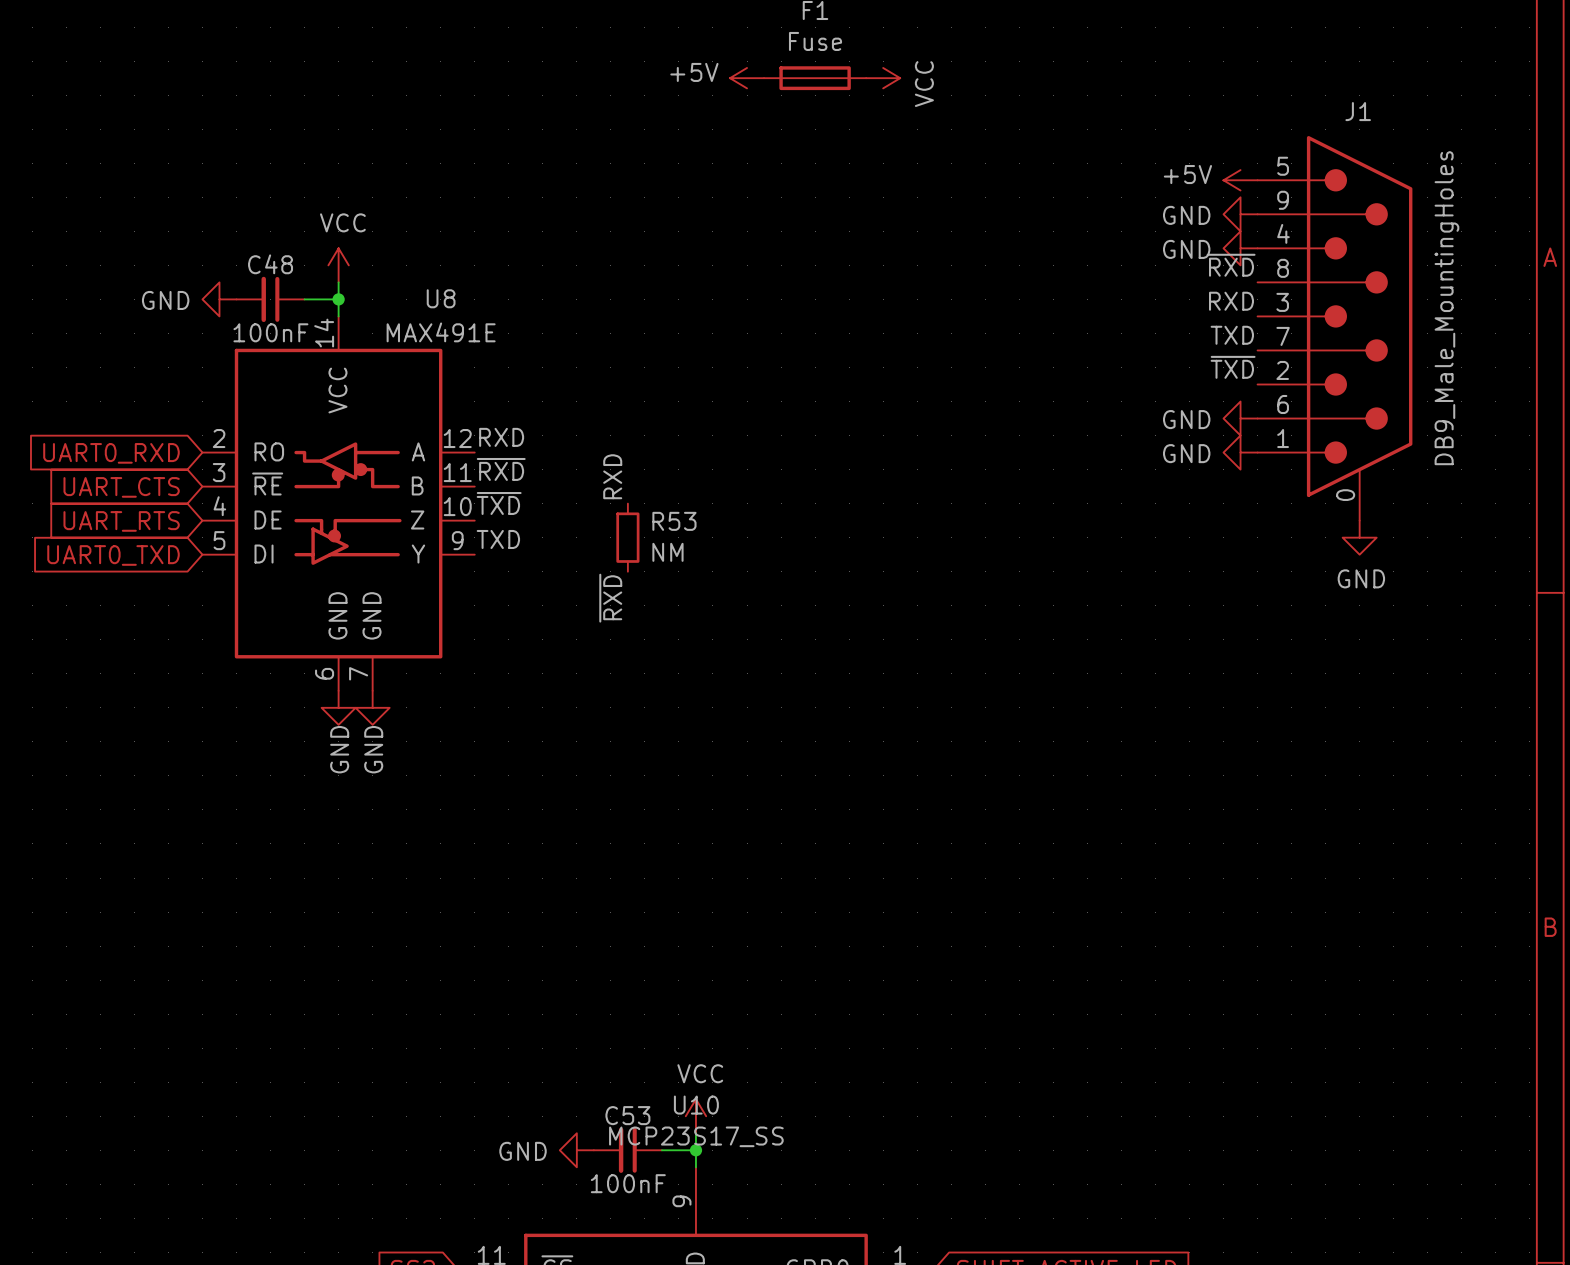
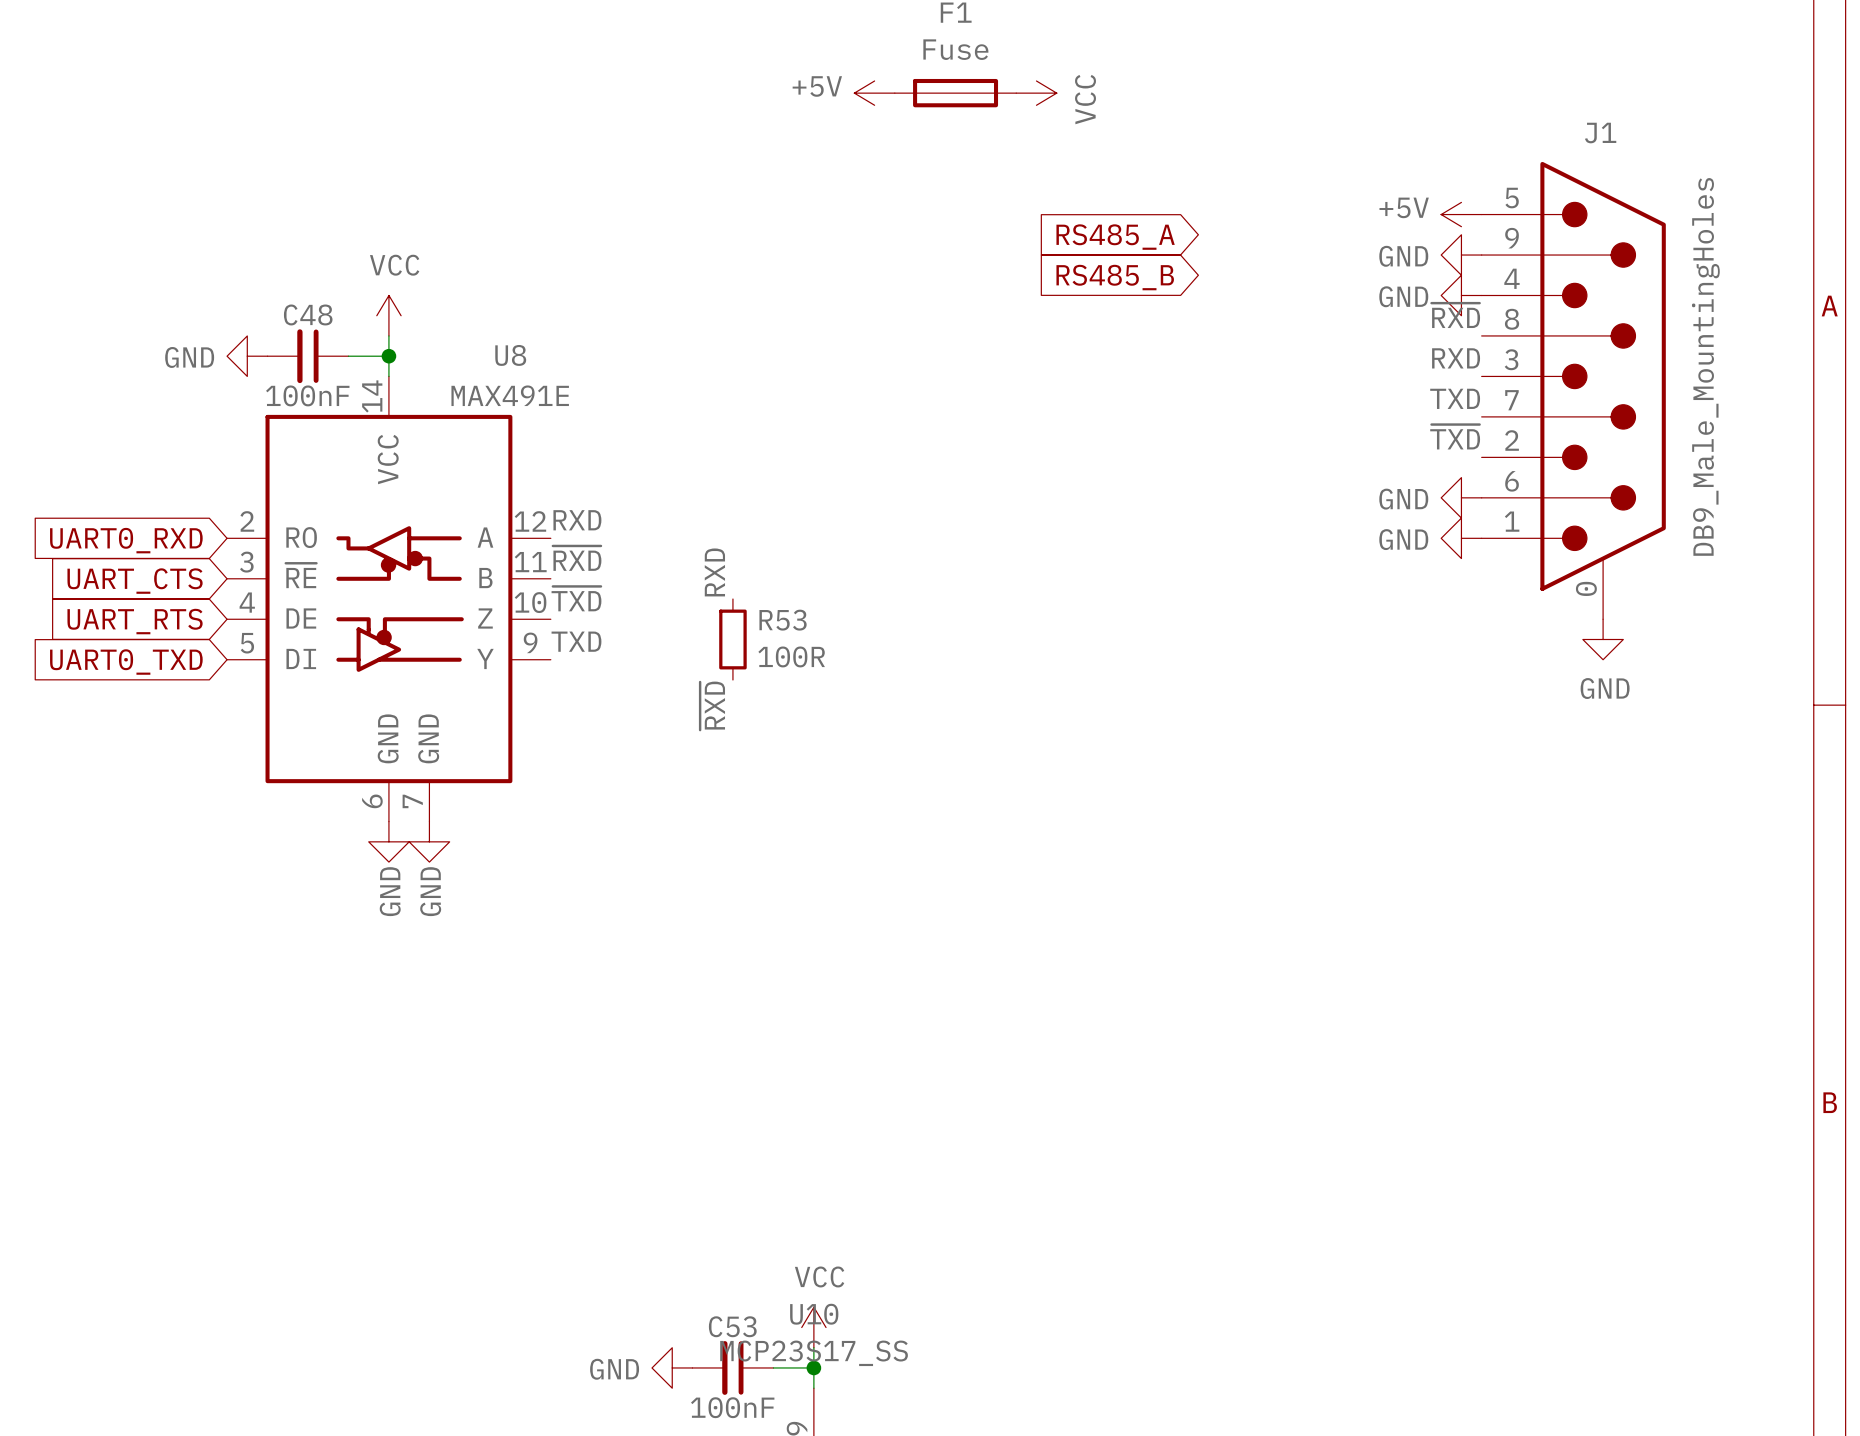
global label: none -> RS485_A (1115, 237)
global label: none -> RS485_B (1115, 277)
R53 value: NM (667, 552) -> 100R (791, 656)

